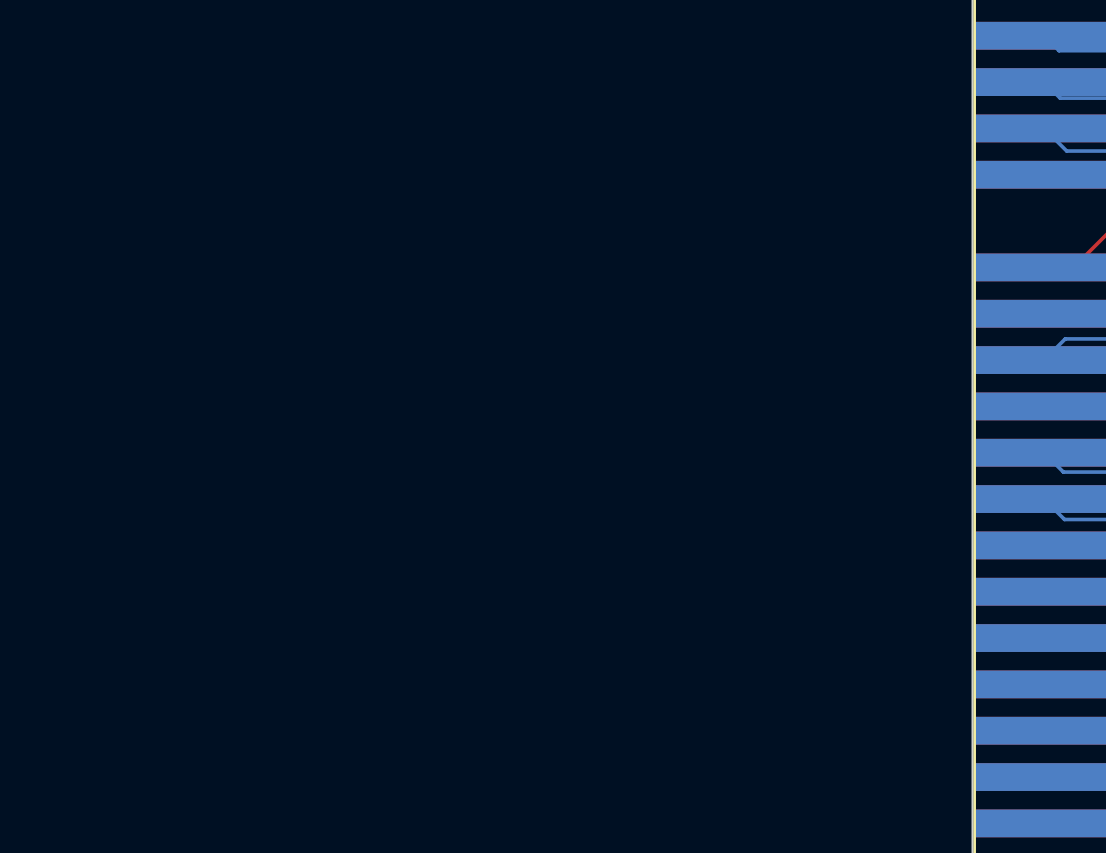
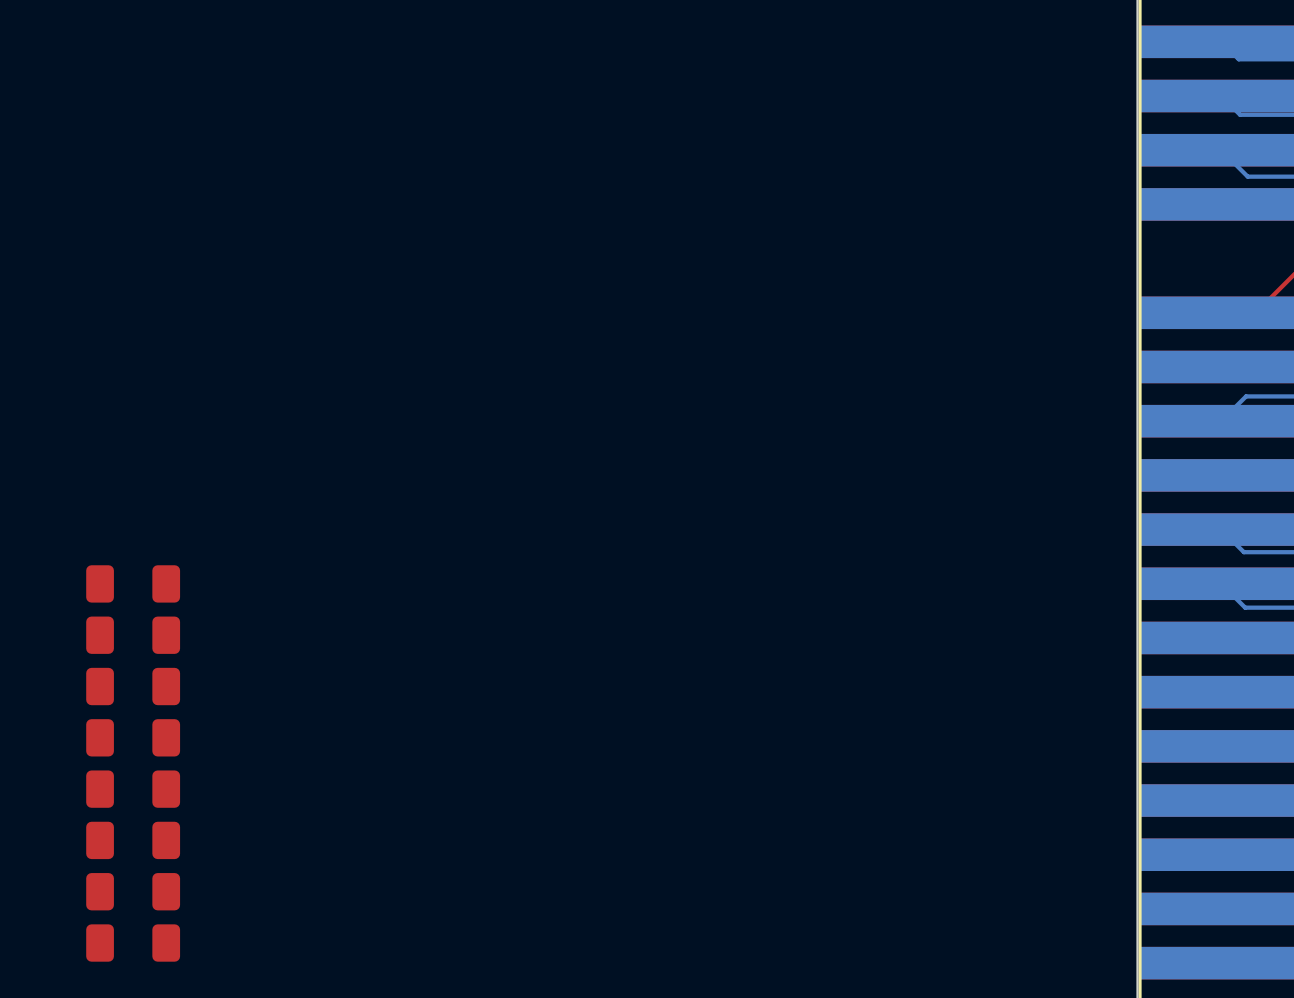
part: none -> (133, 583)
part: none -> (133, 635)
part: none -> (133, 686)
part: none -> (133, 737)
part: none -> (133, 789)
part: none -> (133, 840)
part: none -> (133, 891)
part: none -> (133, 943)

